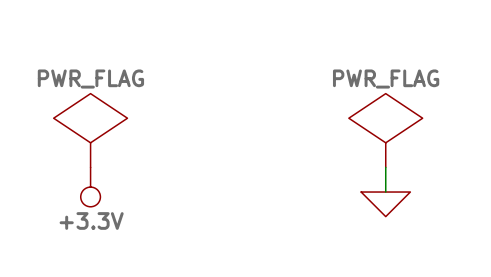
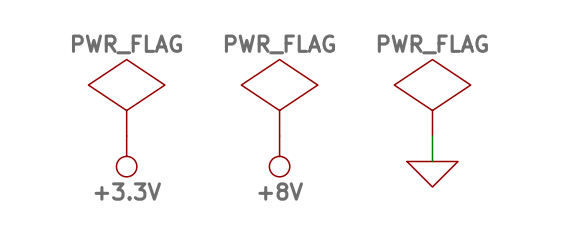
power symbol: none -> PWR_FLAG (279, 97)
power symbol: none -> +8V (279, 156)

